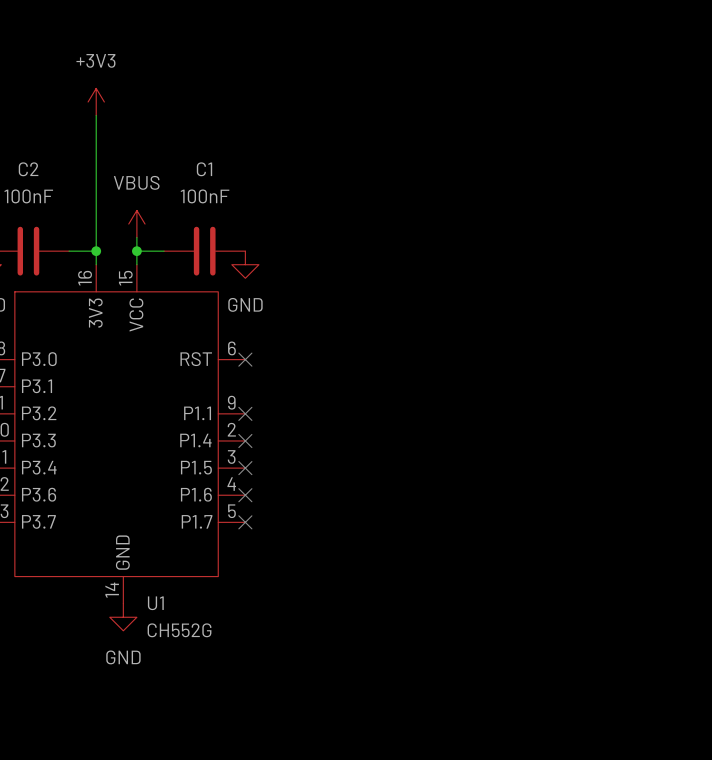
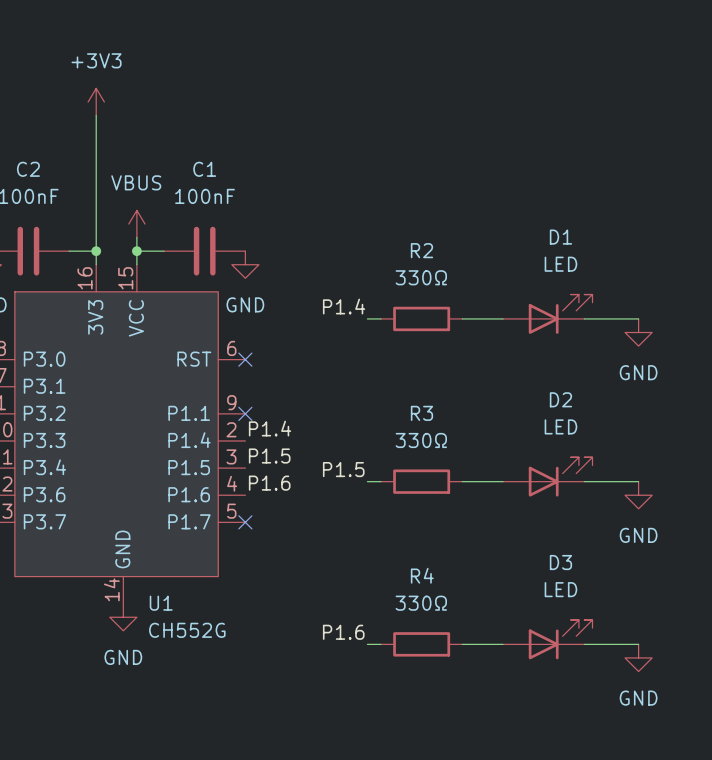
label: none -> P1.4 (344, 306)
D1: none -> LED (547, 314)
wire: none -> (367, 318) (380, 318)
R2: none -> 330Ω (421, 318)
wire: none -> (462, 318) (503, 318)
wire: none -> (584, 318) (638, 318)
power symbol: none -> GND (638, 332)
label: none -> P1.4 (270, 428)
no-connect mark: (245, 440) -> none
label: none -> P1.5 (269, 456)
no-connect mark: (245, 468) -> none
label: none -> P1.5 (343, 469)
D2: none -> LED (547, 476)
wire: none -> (367, 481) (380, 481)
R3: none -> 330Ω (421, 481)
wire: none -> (462, 481) (503, 481)
wire: none -> (584, 481) (638, 481)
label: none -> P1.6 (269, 483)
no-connect mark: (245, 495) -> none
power symbol: none -> GND (638, 495)
label: none -> P1.6 (343, 632)
D3: none -> LED (547, 639)
wire: none -> (367, 644) (380, 644)
R4: none -> 330Ω (421, 644)
wire: none -> (462, 644) (503, 644)
wire: none -> (584, 644) (638, 644)
power symbol: none -> GND (638, 657)

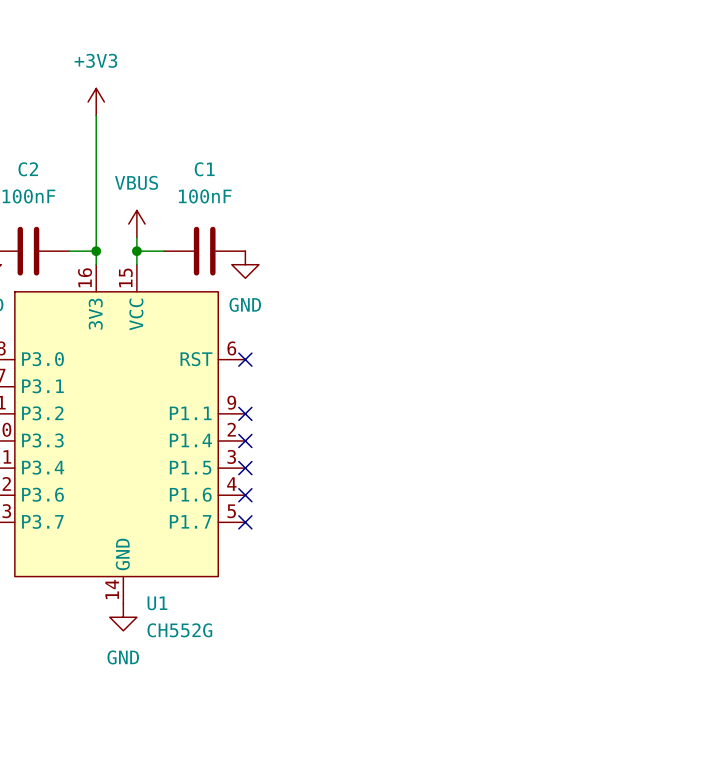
label: P1.4 (344, 306) -> none
D1: LED (547, 314) -> none
wire: (367, 318) (380, 318) -> none
R2: 330Ω (421, 318) -> none
wire: (462, 318) (503, 318) -> none
wire: (584, 318) (638, 318) -> none
power symbol: GND (638, 332) -> none
label: P1.4 (270, 428) -> none
no-connect mark: none -> (245, 440)
label: P1.5 (269, 456) -> none
no-connect mark: none -> (245, 468)
label: P1.5 (343, 469) -> none
D2: LED (547, 476) -> none
wire: (367, 481) (380, 481) -> none
R3: 330Ω (421, 481) -> none
wire: (462, 481) (503, 481) -> none
wire: (584, 481) (638, 481) -> none
label: P1.6 (269, 483) -> none
no-connect mark: none -> (245, 495)
power symbol: GND (638, 495) -> none
label: P1.6 (343, 632) -> none
D3: LED (547, 639) -> none
wire: (367, 644) (380, 644) -> none
R4: 330Ω (421, 644) -> none
wire: (462, 644) (503, 644) -> none
wire: (584, 644) (638, 644) -> none
power symbol: GND (638, 657) -> none

